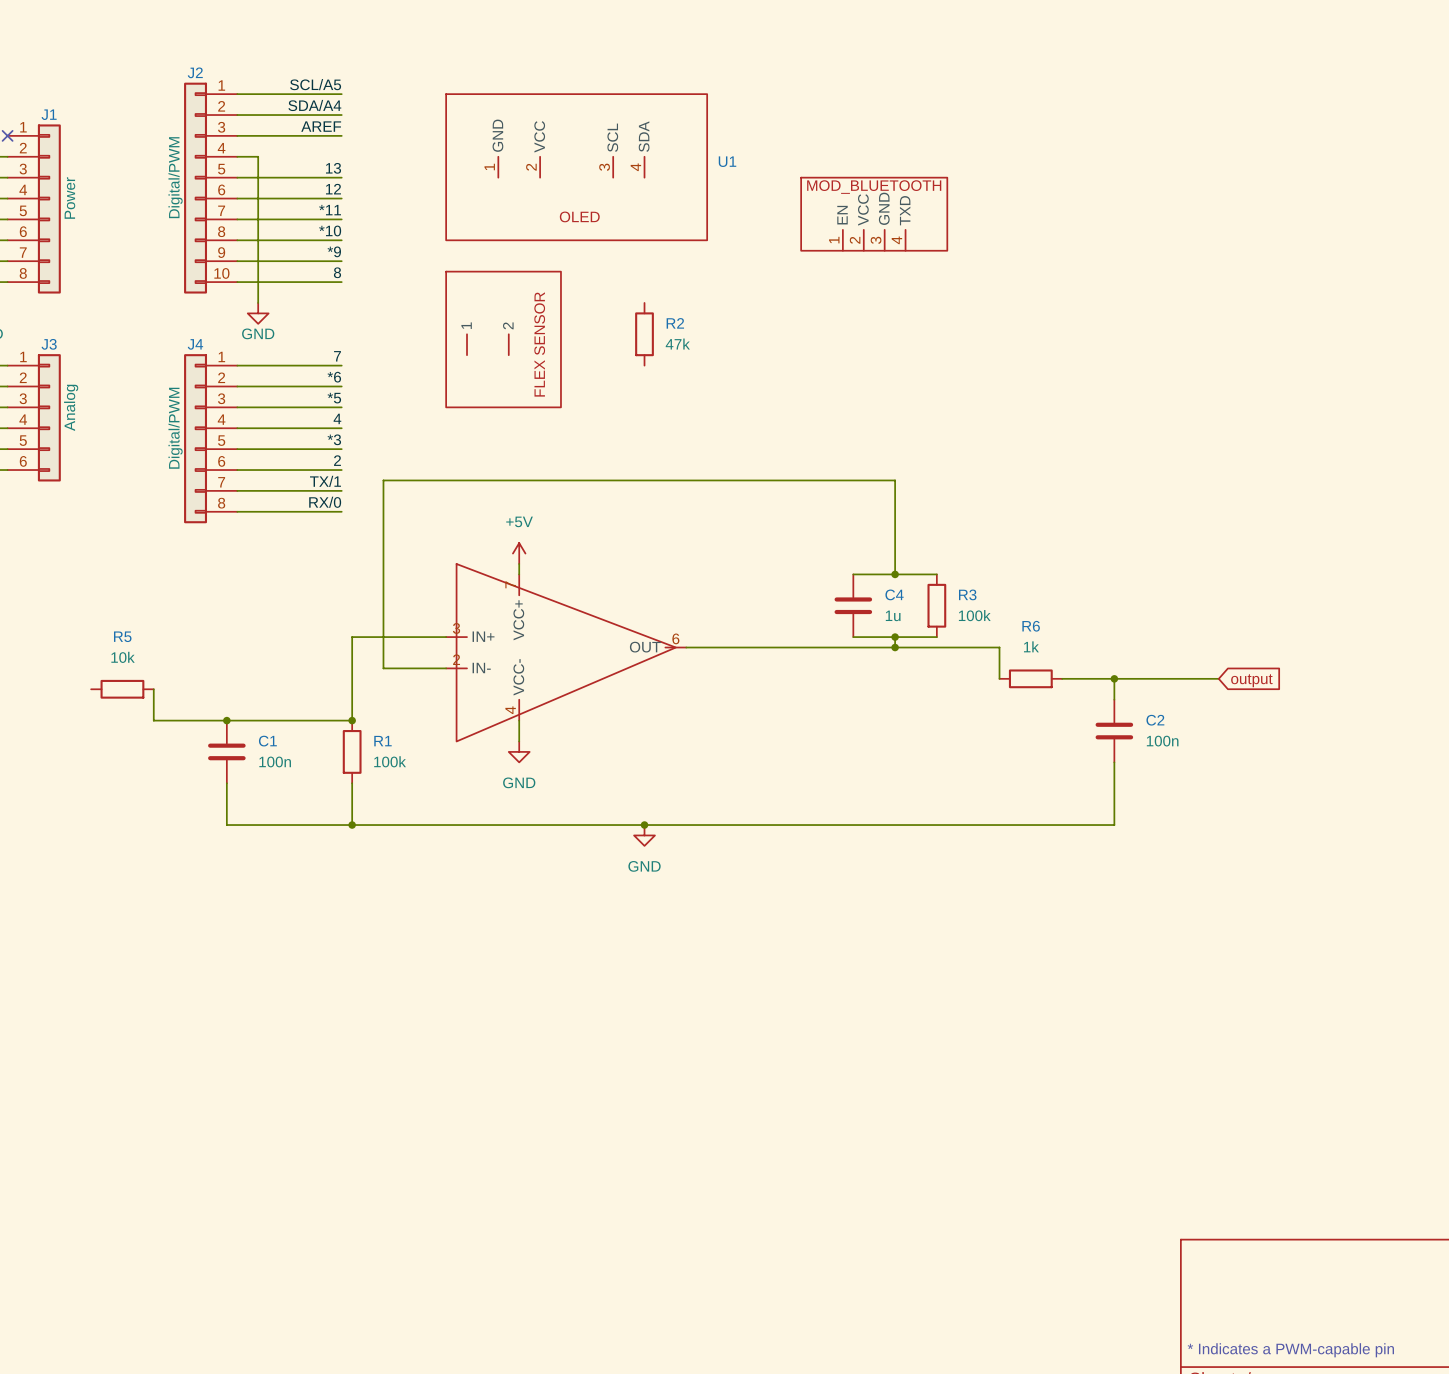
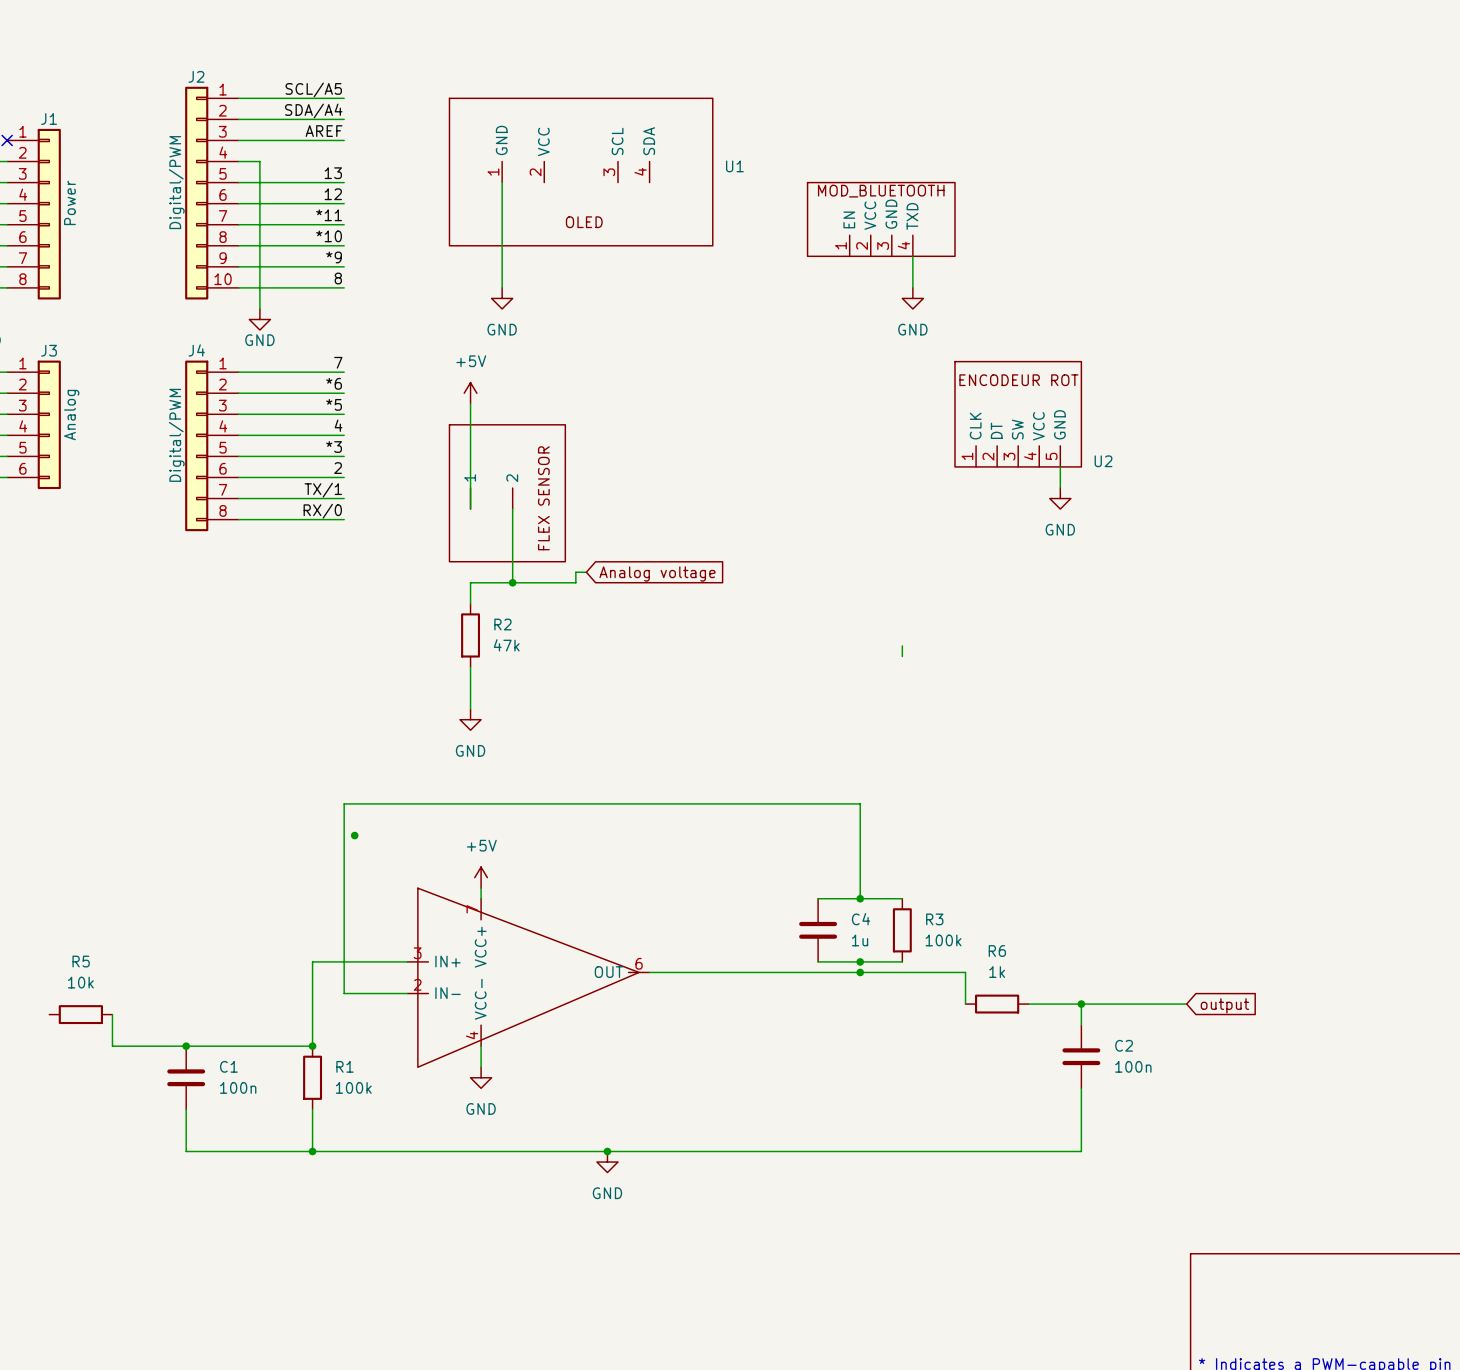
wire: none -> (502, 182) (502, 287)
wire: none -> (912, 256) (912, 287)
power symbol: none -> GND (502, 298)
power symbol: none -> GND (912, 298)
R2 position: (644, 334) -> (470, 635)
part position: (503, 339) -> (507, 493)
power symbol: none -> +5V (470, 393)
wire: none -> (470, 403) (470, 509)
U2: none -> (1018, 414)
wire: none -> (1060, 466) (1060, 488)
power symbol: none -> GND (1060, 498)
wire: none -> (512, 509) (512, 582)
power symbol: +5V (519, 553) -> none
wire: (519, 563) (519, 574) -> none
wire: none -> (586, 572) (575, 572) (575, 582) (470, 582) (470, 603)
global label: none -> Analog voltage (657, 574)
junction: none -> (512, 582)
wire: (853, 574) (936, 574) -> none
wire: (895, 574) (895, 480) (383, 480) (383, 668) (446, 668) -> none
junction: (895, 574) -> none
C4 position: (853, 605) -> (818, 930)
R3 position: (936, 605) -> (902, 930)
wire: (446, 637) (352, 637) (352, 720) (153, 720) (153, 689) -> none
wire: (853, 637) (936, 637) -> none
junction: (895, 637) -> none
wire: (686, 647) (999, 647) (999, 678) -> none
junction: (895, 647) -> none
part: (566, 652) -> none
R6 position: (1030, 678) -> (997, 1004)
wire: (1062, 678) (1218, 678) -> none
wire: (1114, 678) (1114, 699) -> none
junction: (1114, 678) -> none
global label: output (1251, 680) -> none
R5 position: (122, 689) -> (80, 1014)
junction: (226, 720) -> none
junction: (352, 720) -> none
wire: (519, 720) (519, 741) -> none
C2 position: (1114, 731) -> (1081, 1056)
C1 position: (226, 751) -> (186, 1077)
R1 position: (352, 751) -> (312, 1077)
power symbol position: GND (519, 751) -> GND (470, 719)
wire: (1114, 762) (1114, 825) (226, 825) (226, 783) -> none
wire: (352, 783) (352, 825) -> (470, 667) (470, 709)
junction: (644, 825) -> none
power symbol: GND (644, 835) -> none
power symbol: none -> +5V (481, 877)
wire: none -> (481, 888) (481, 898)
wire: none -> (818, 898) (902, 898)
wire: none -> (860, 898) (860, 803) (344, 803) (344, 993) (407, 993)
junction: none -> (860, 898)
wire: none -> (407, 961) (312, 961) (312, 1046) (112, 1046) (112, 1014)
wire: none -> (818, 961) (902, 961)
junction: none -> (860, 961)
wire: none -> (649, 972) (965, 972) (965, 1004)
junction: none -> (860, 972)
part: none -> (528, 977)
wire: none -> (1028, 1004) (1186, 1004)
wire: none -> (1081, 1004) (1081, 1025)
junction: none -> (1081, 1004)
global label: none -> output (1224, 1005)
junction: none -> (186, 1046)
junction: none -> (312, 1046)
wire: none -> (481, 1046) (481, 1067)
power symbol: none -> GND (481, 1077)
wire: none -> (1081, 1088) (1081, 1151) (186, 1151) (186, 1109)
wire: none -> (312, 1109) (312, 1151)
junction: none -> (312, 1151)
junction: none -> (607, 1151)
power symbol: none -> GND (607, 1162)

